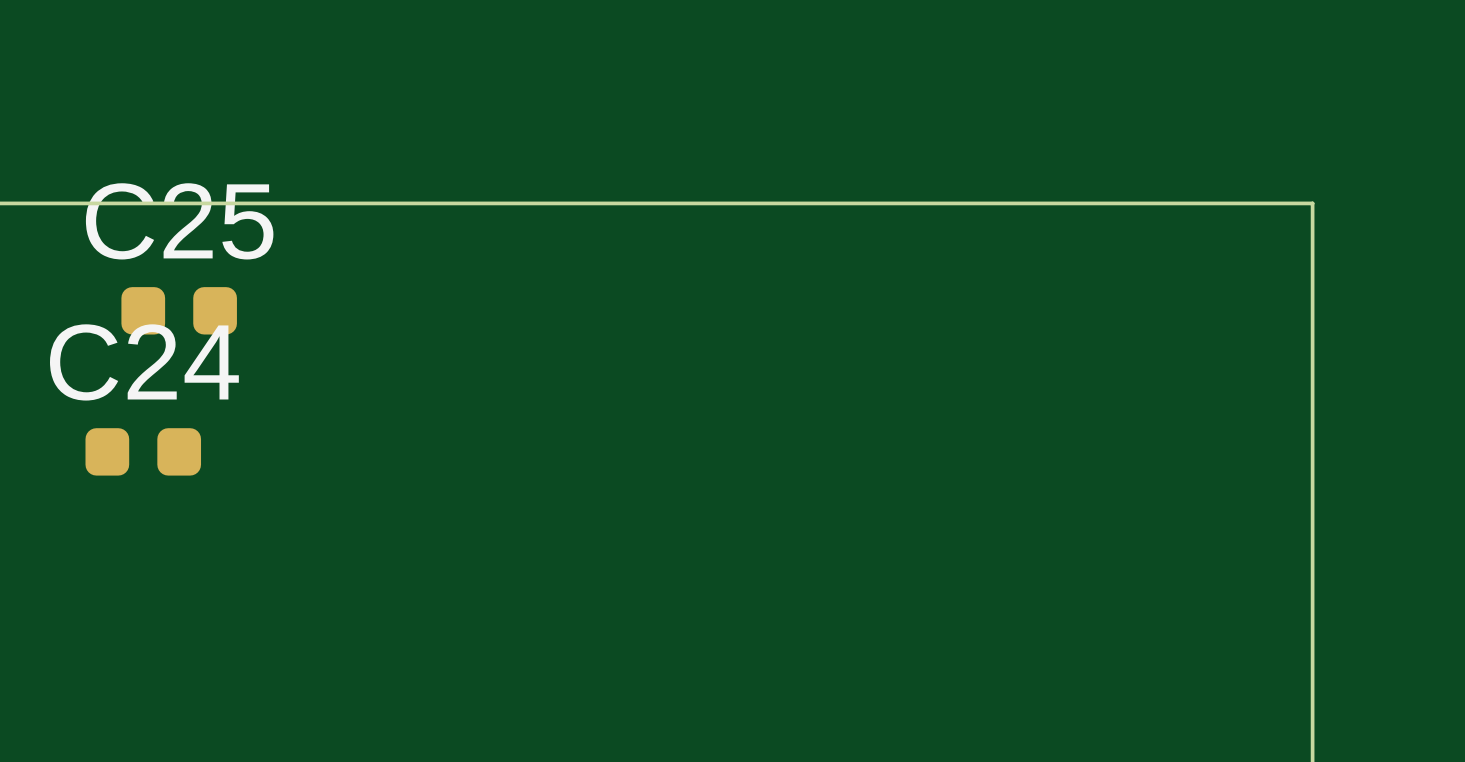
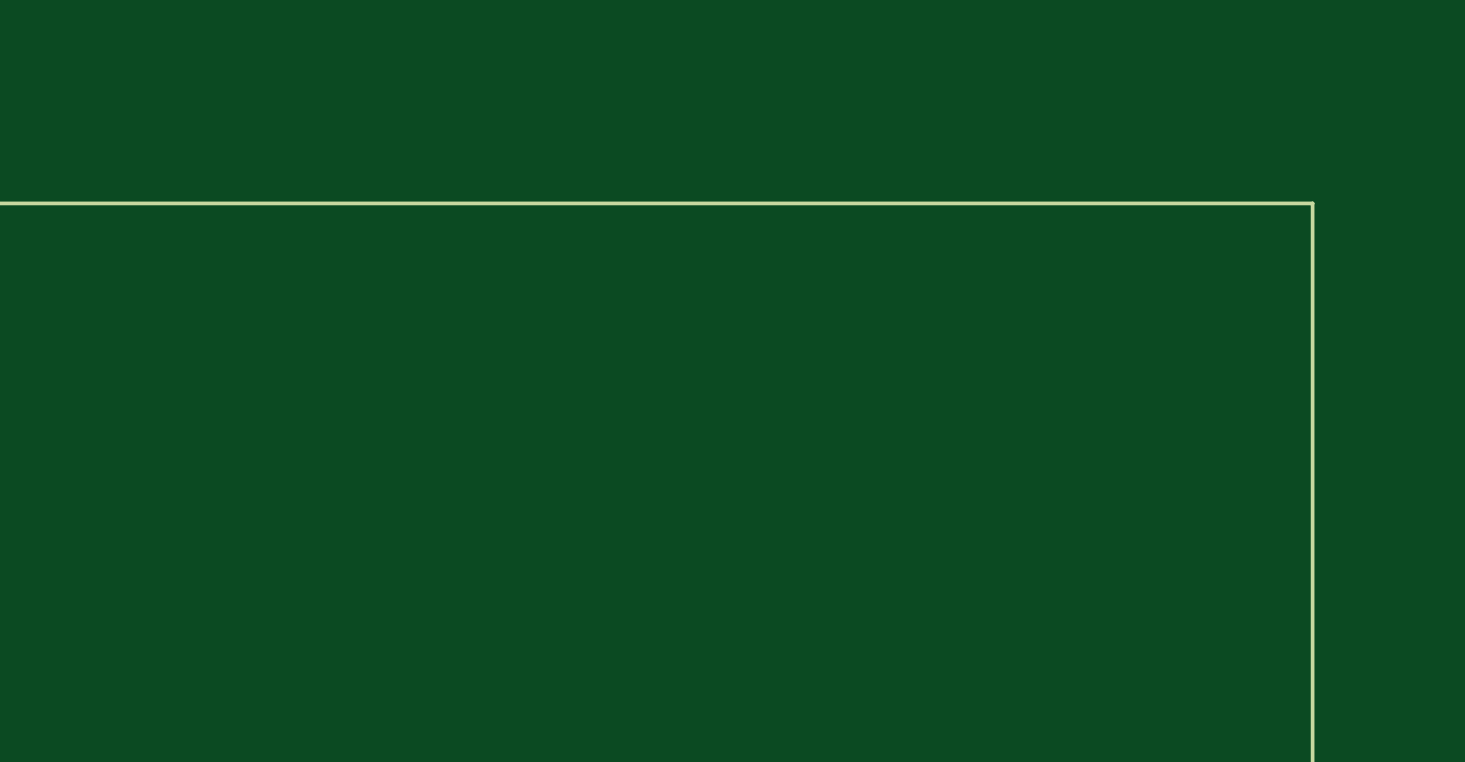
C25: (179, 310) -> none
C24: (143, 451) -> none

